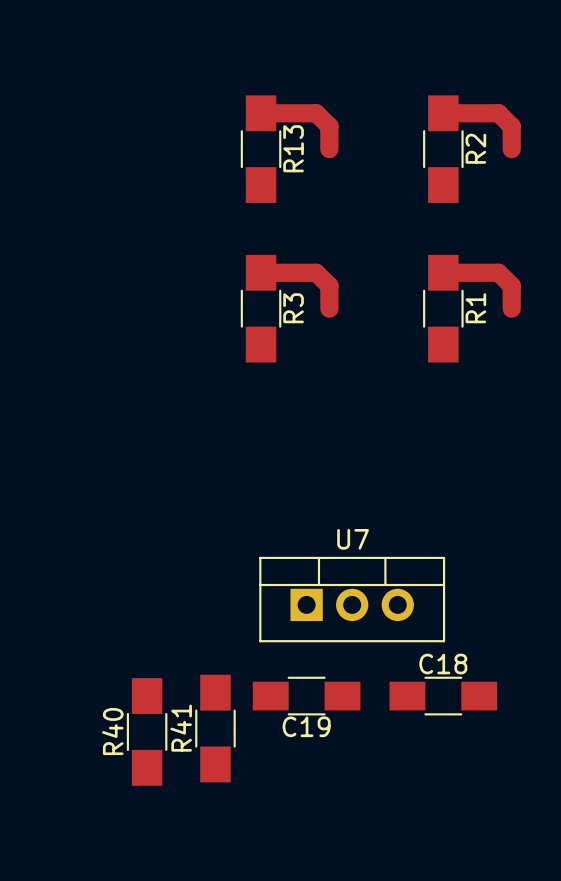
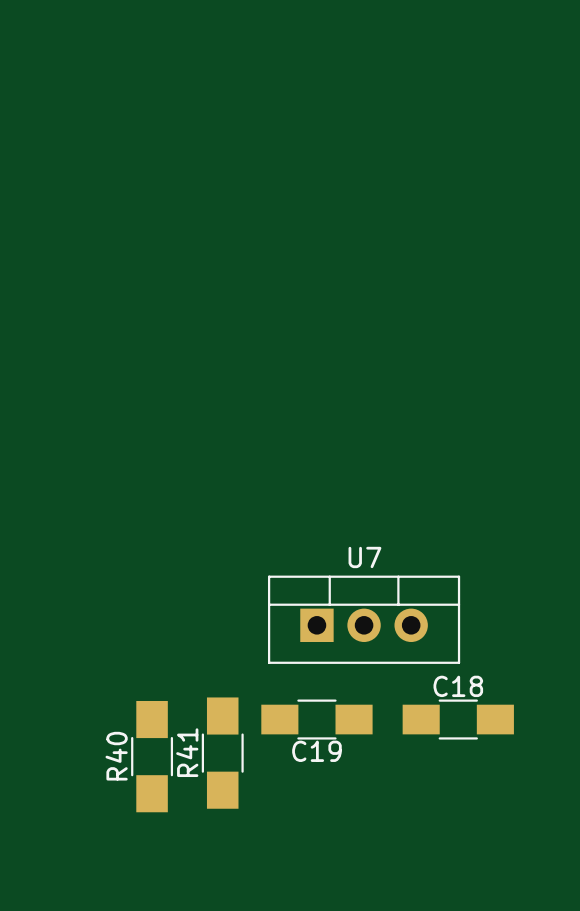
track: (261, 113) (316, 113) (329, 126) (329, 149) -> none
track: (443, 113) (498, 113) (511, 126) (511, 149) -> none
R13: (261, 149) -> none
R2: (443, 149) -> none
track: (261, 272) (316, 272) (329, 285) (329, 308) -> none
track: (443, 272) (498, 272) (511, 285) (511, 308) -> none
R3: (261, 308) -> none
R1: (443, 308) -> none

